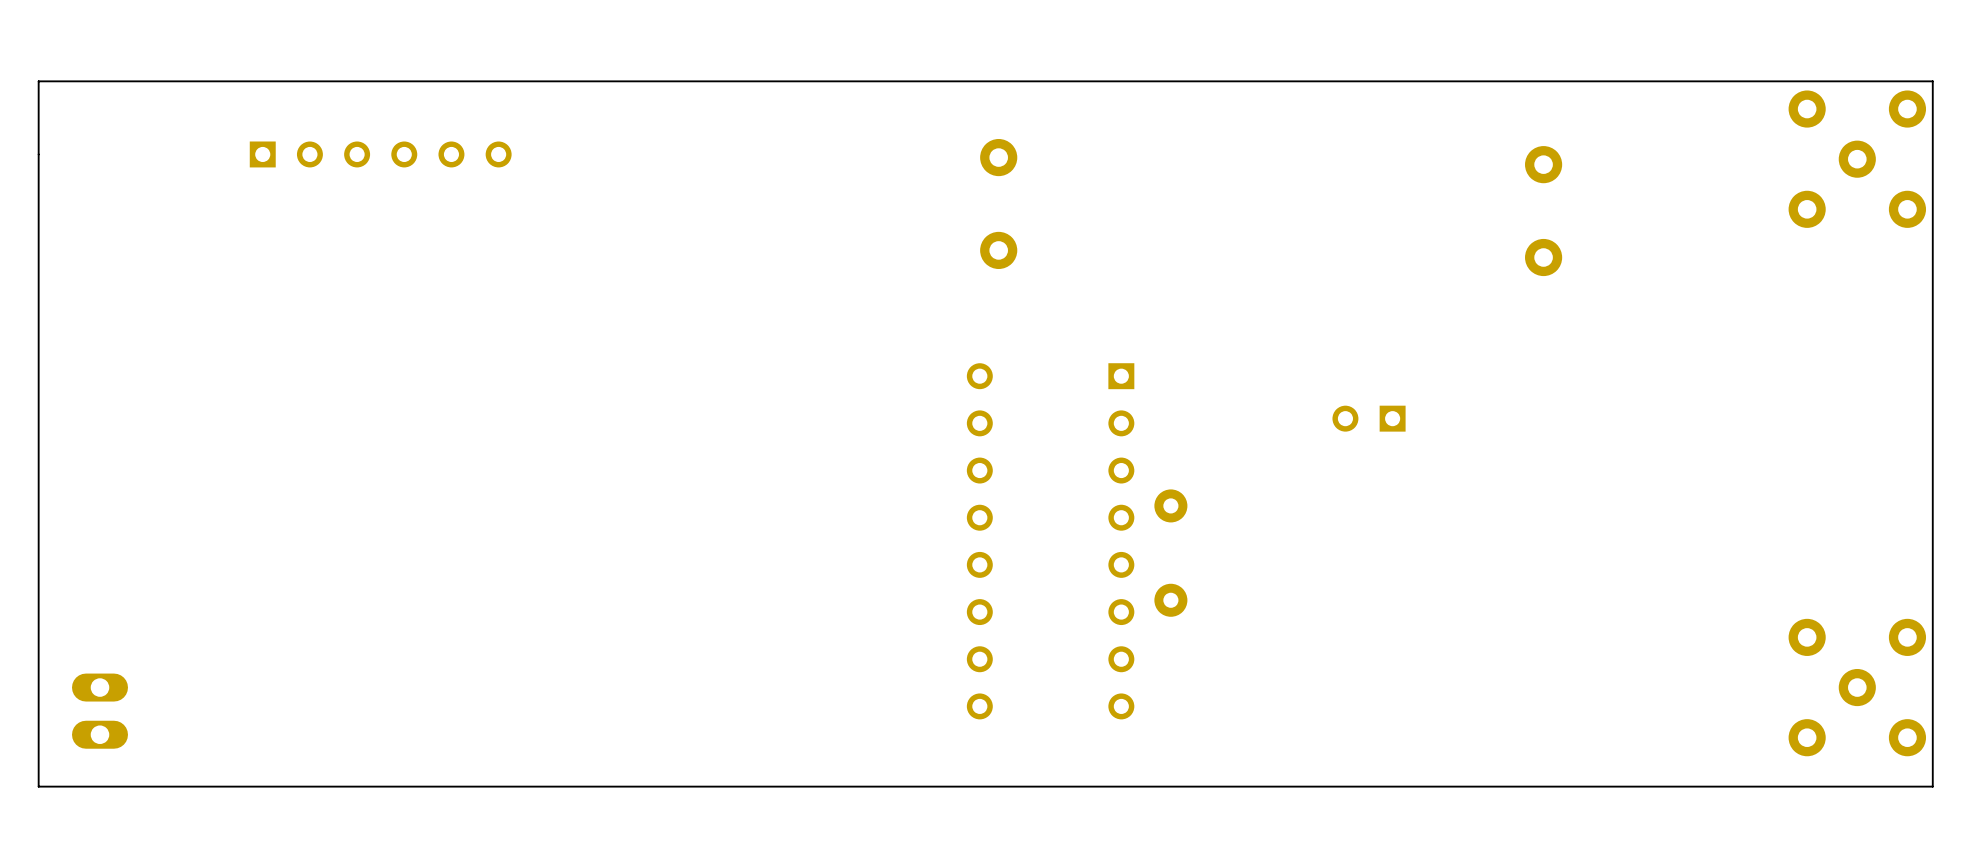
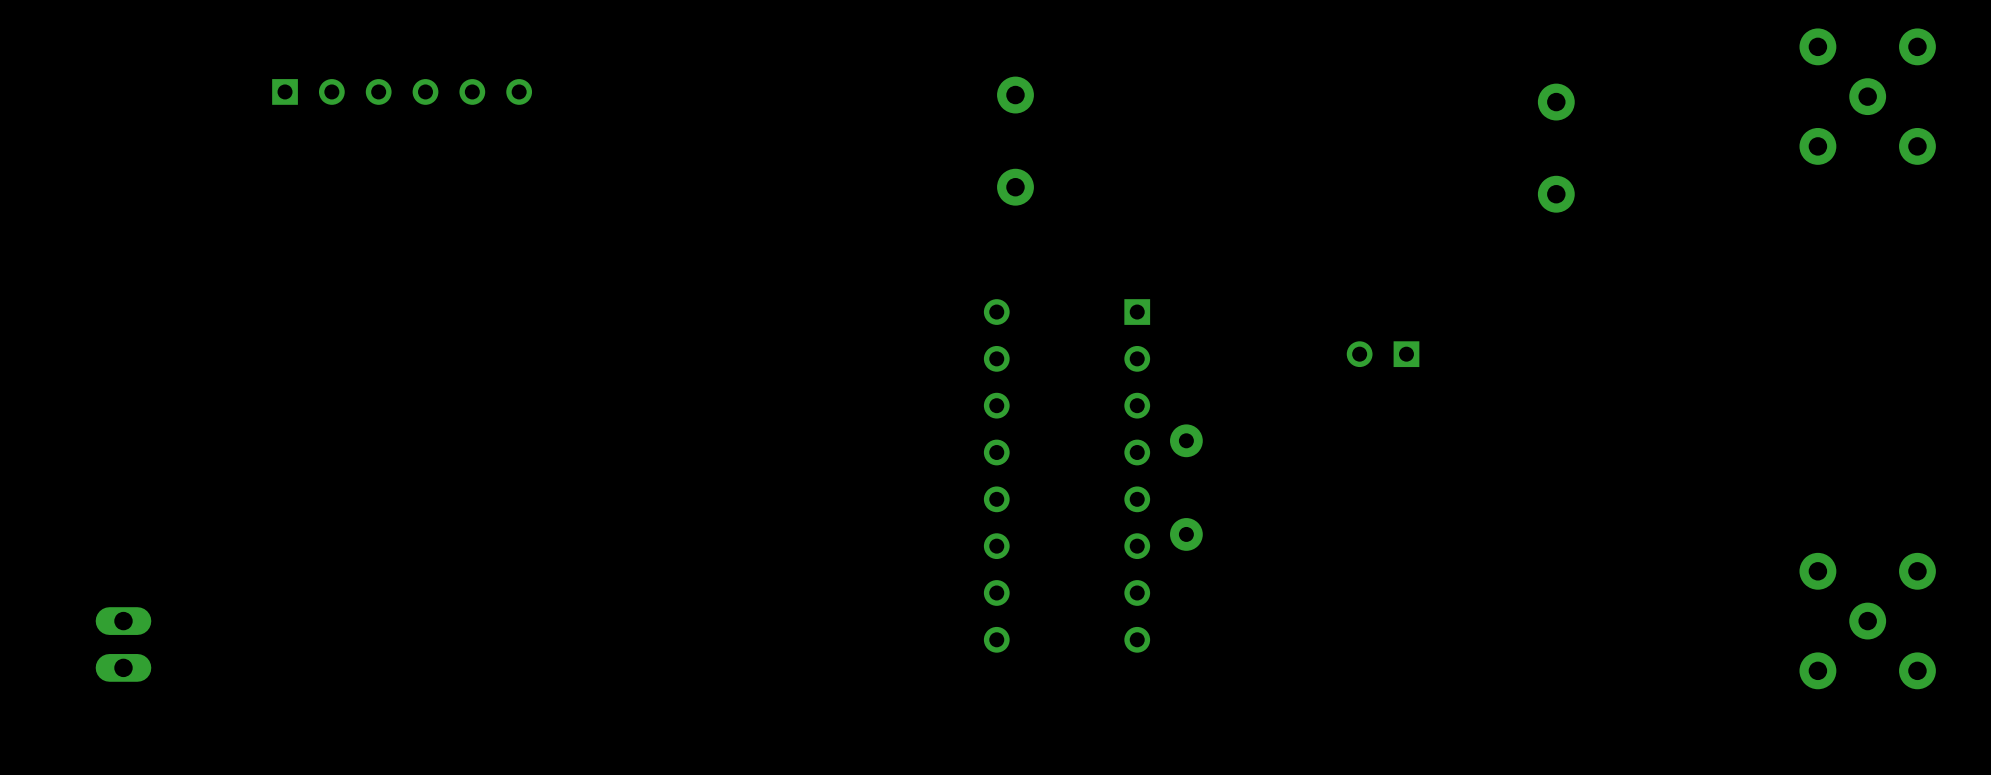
board edge: (1932, 81) (38, 81) (38, 786) (1932, 786) (1932, 81) -> none

